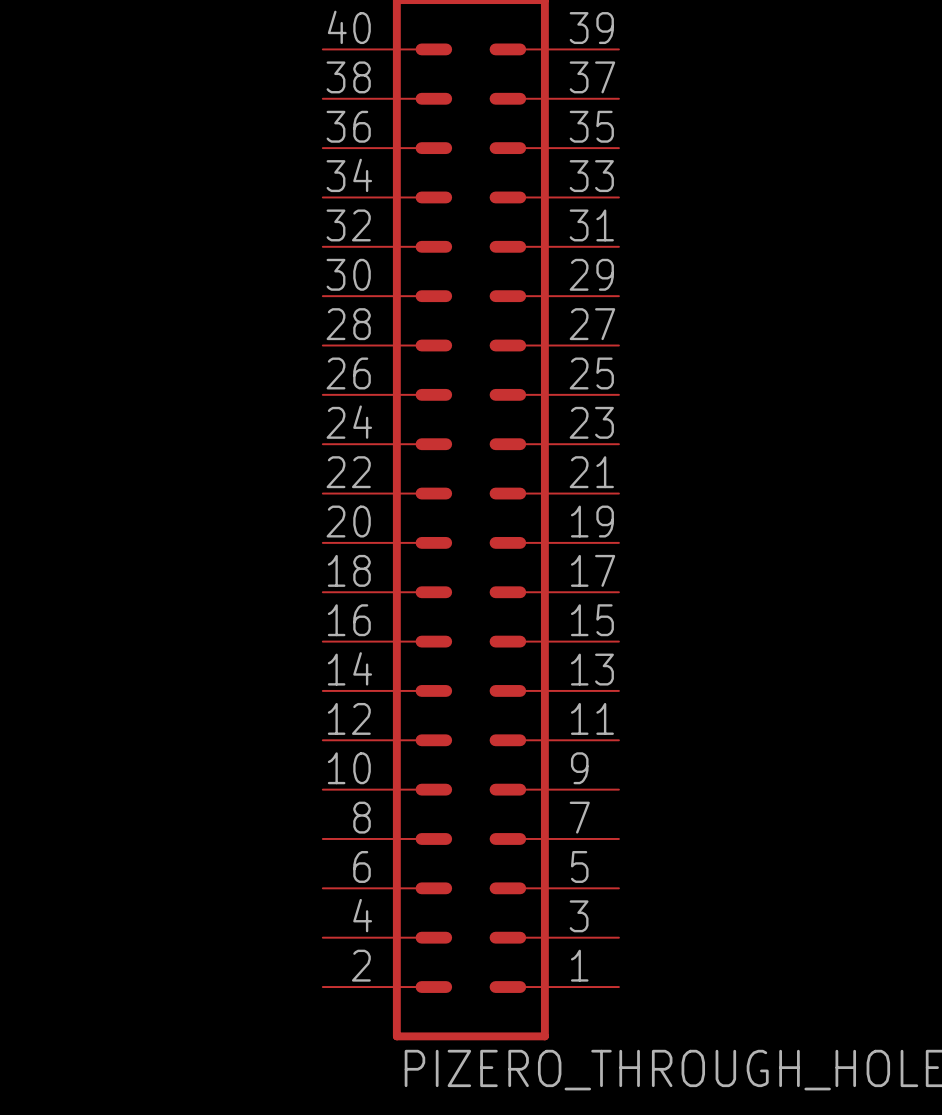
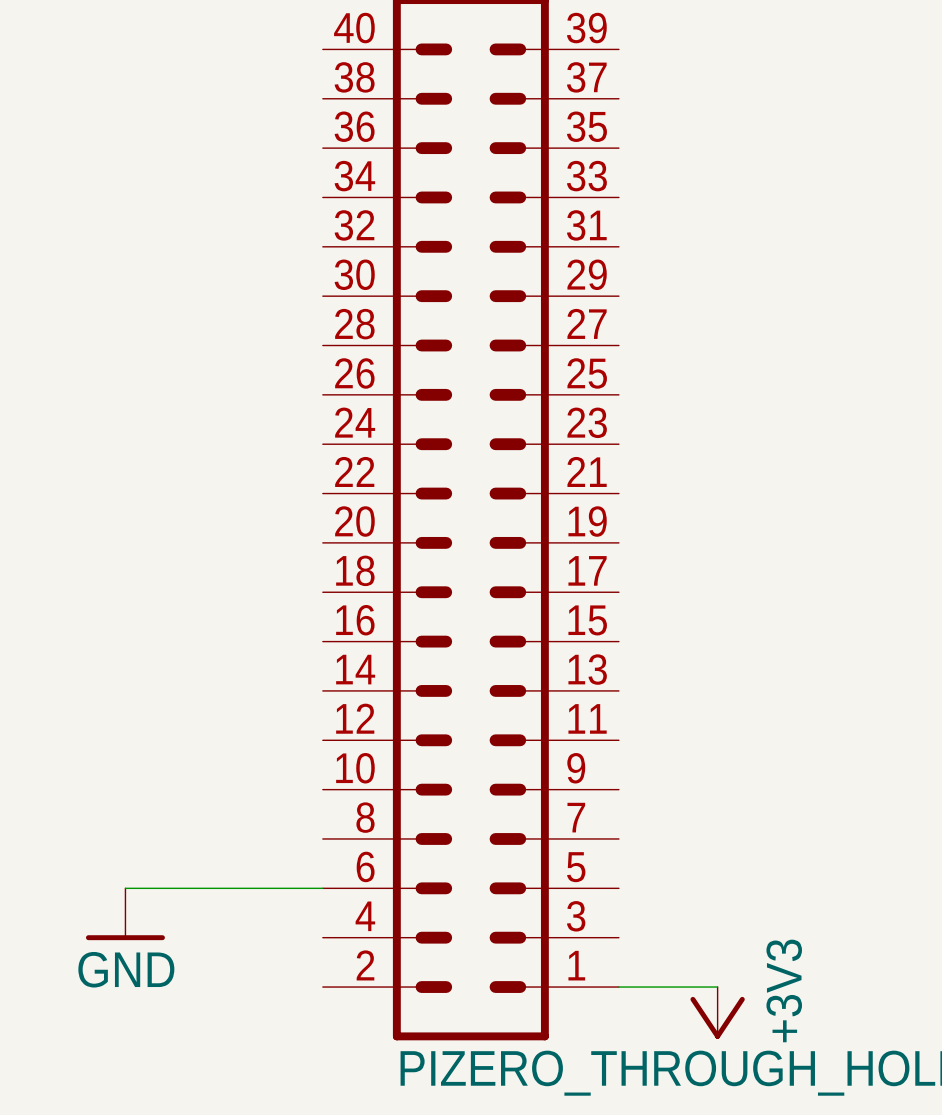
wire: none -> (125, 888) (322, 888)
power symbol: none -> GND (125, 914)
wire: none -> (618, 987) (717, 987)
power symbol: none -> +3V3 (717, 1012)

